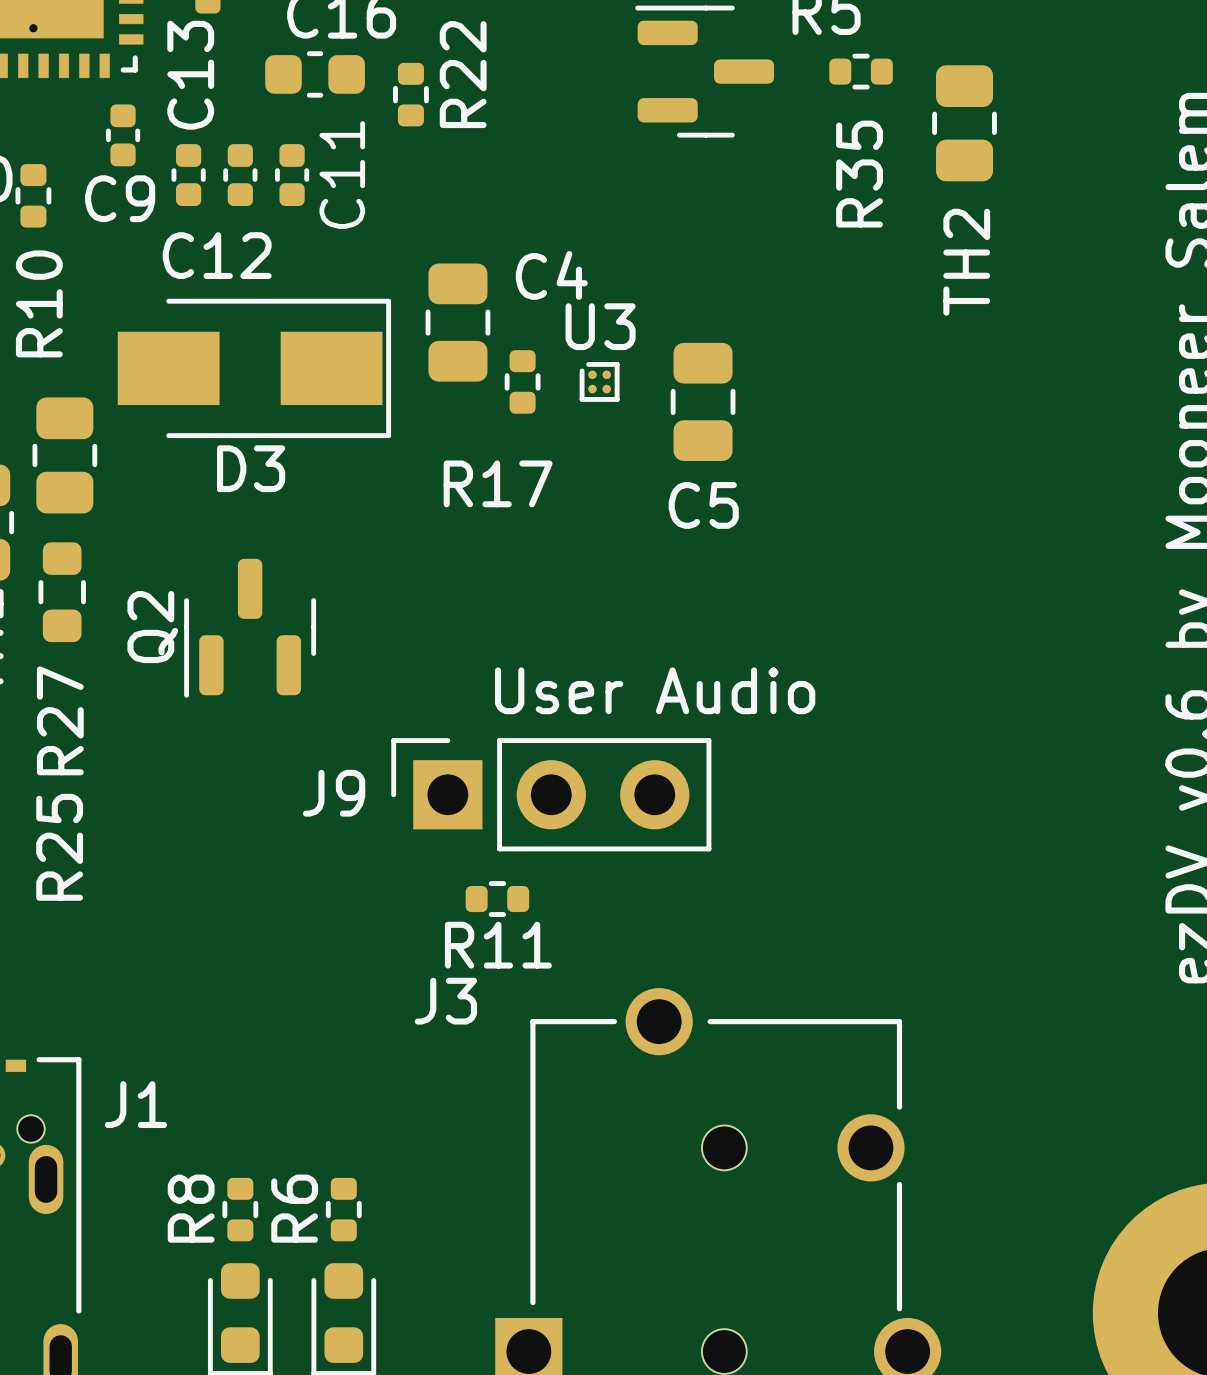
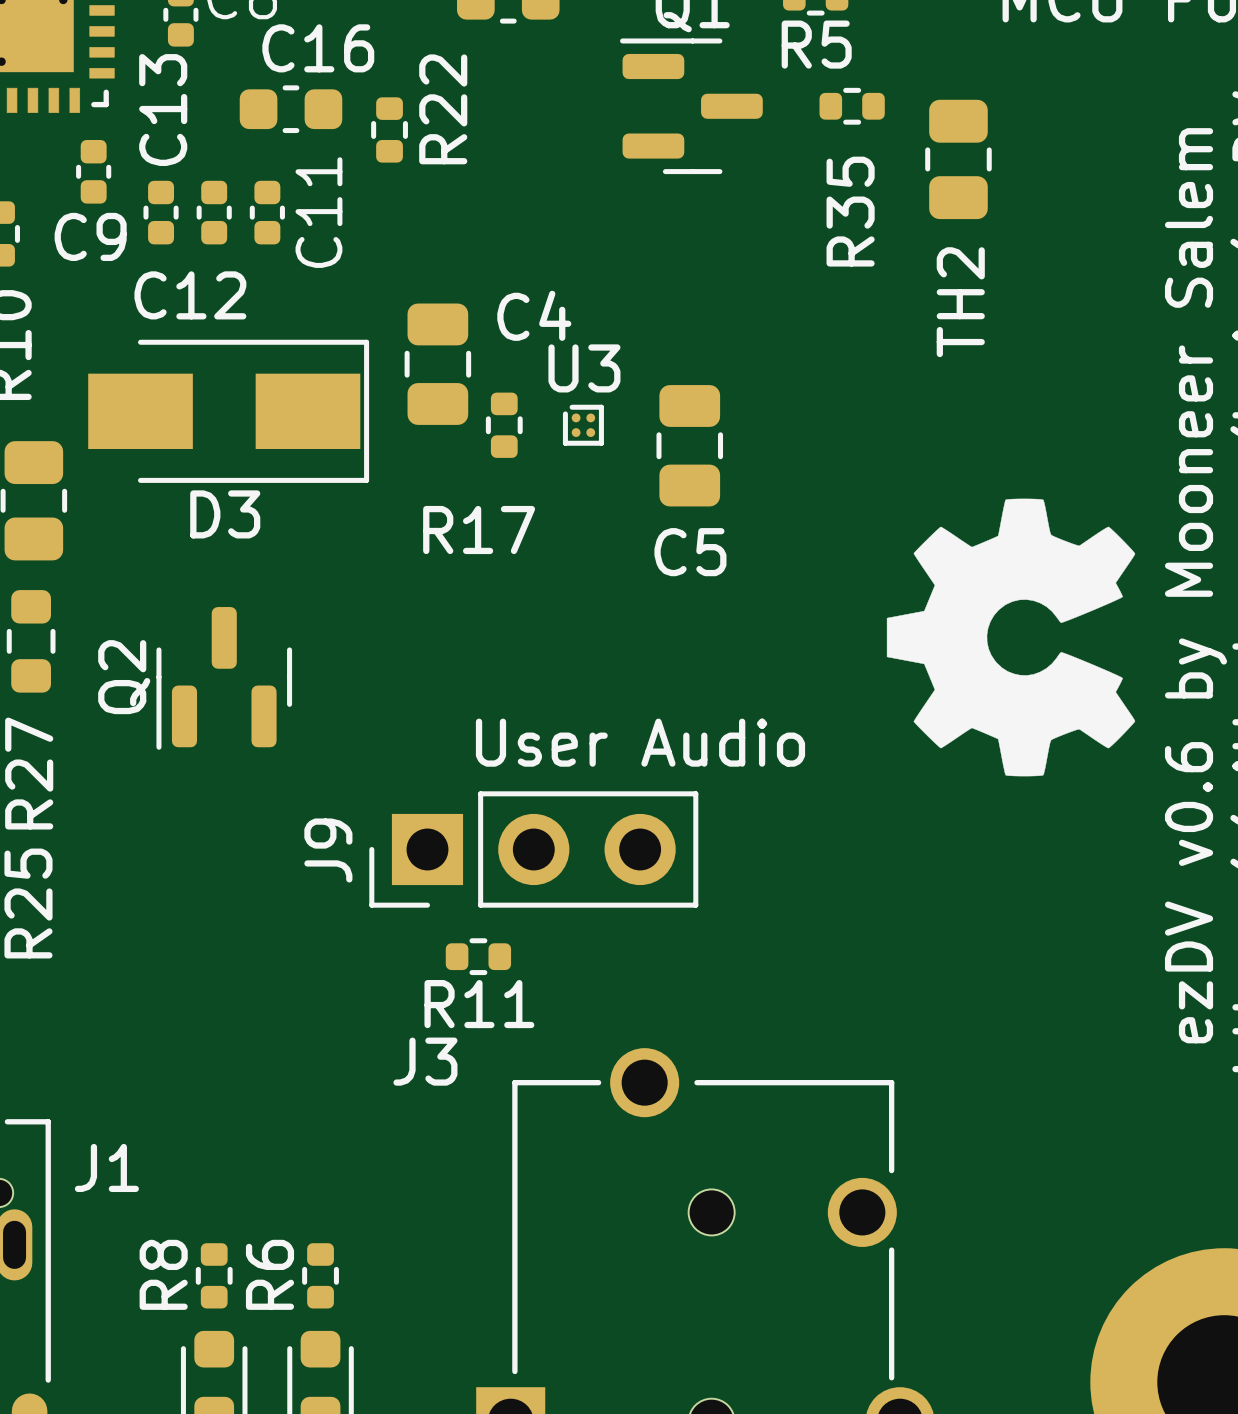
drawing: none -> [886, 498, 1136, 777]
J9 footprint: [391, 738, 712, 852] -> [369, 791, 699, 908]

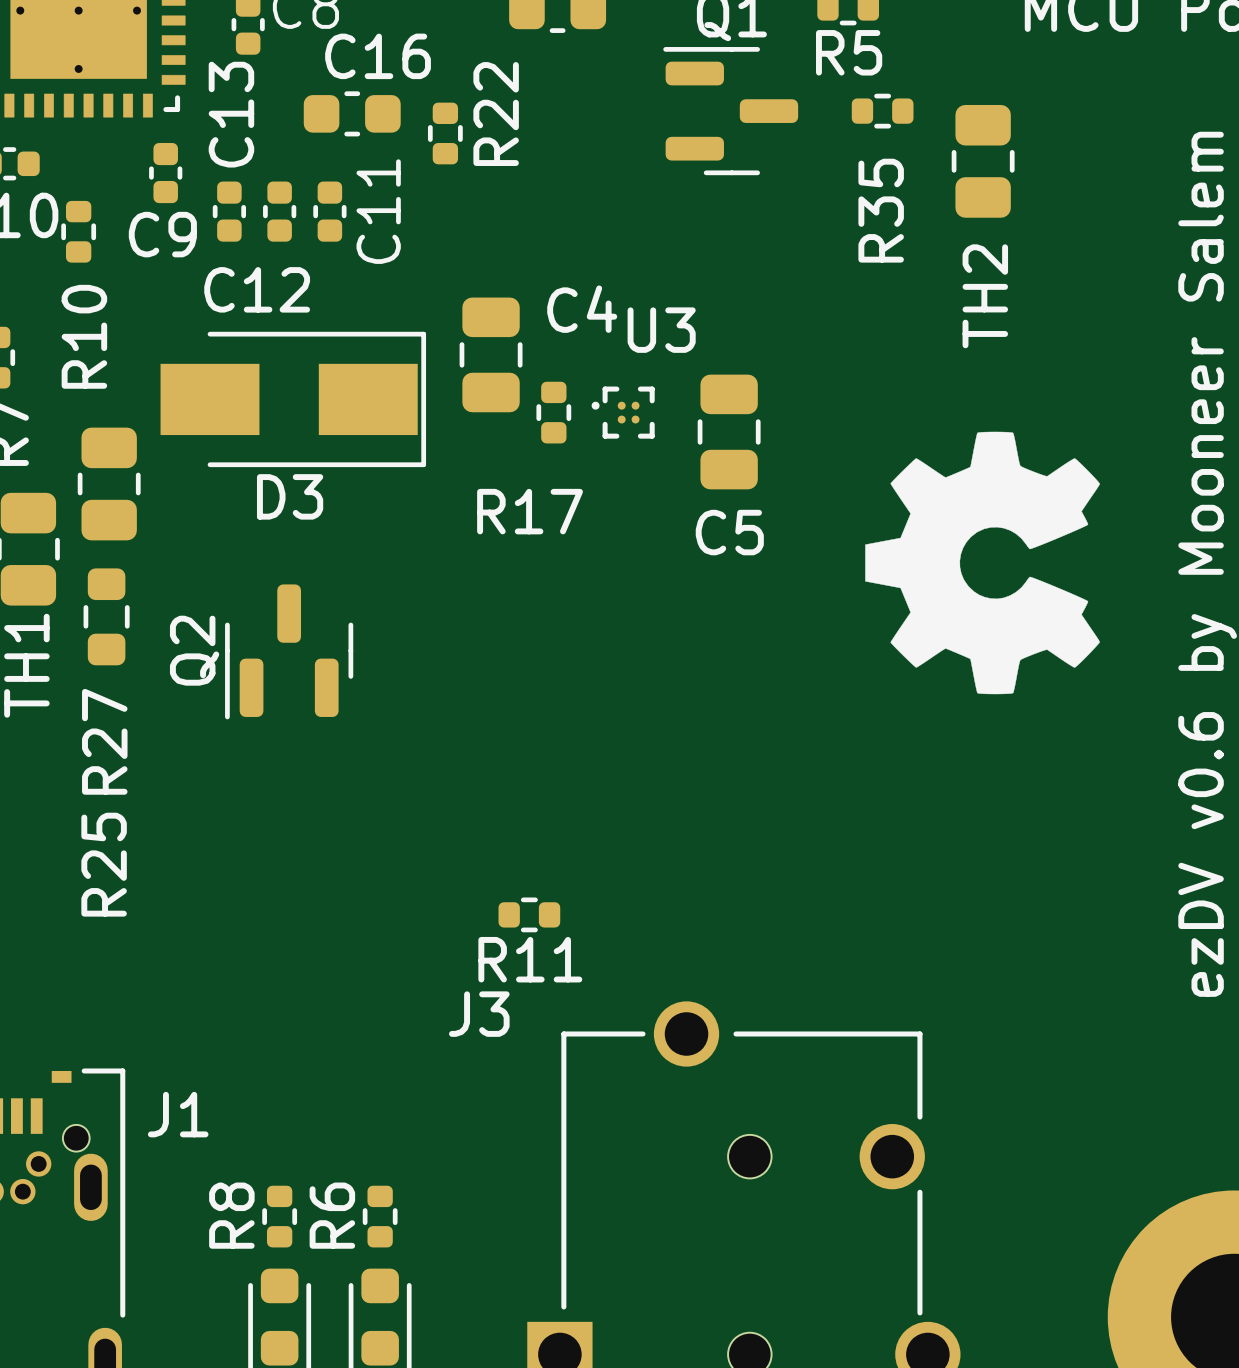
U3 name position: U3 (584, 368) -> U3 (661, 330)
U3 footprint: [562, 404, 604, 446] -> [591, 386, 655, 439]
drawing position: (1011, 637) -> (982, 562)
text: User Audio (640, 742) -> none
J9: (533, 849) -> none

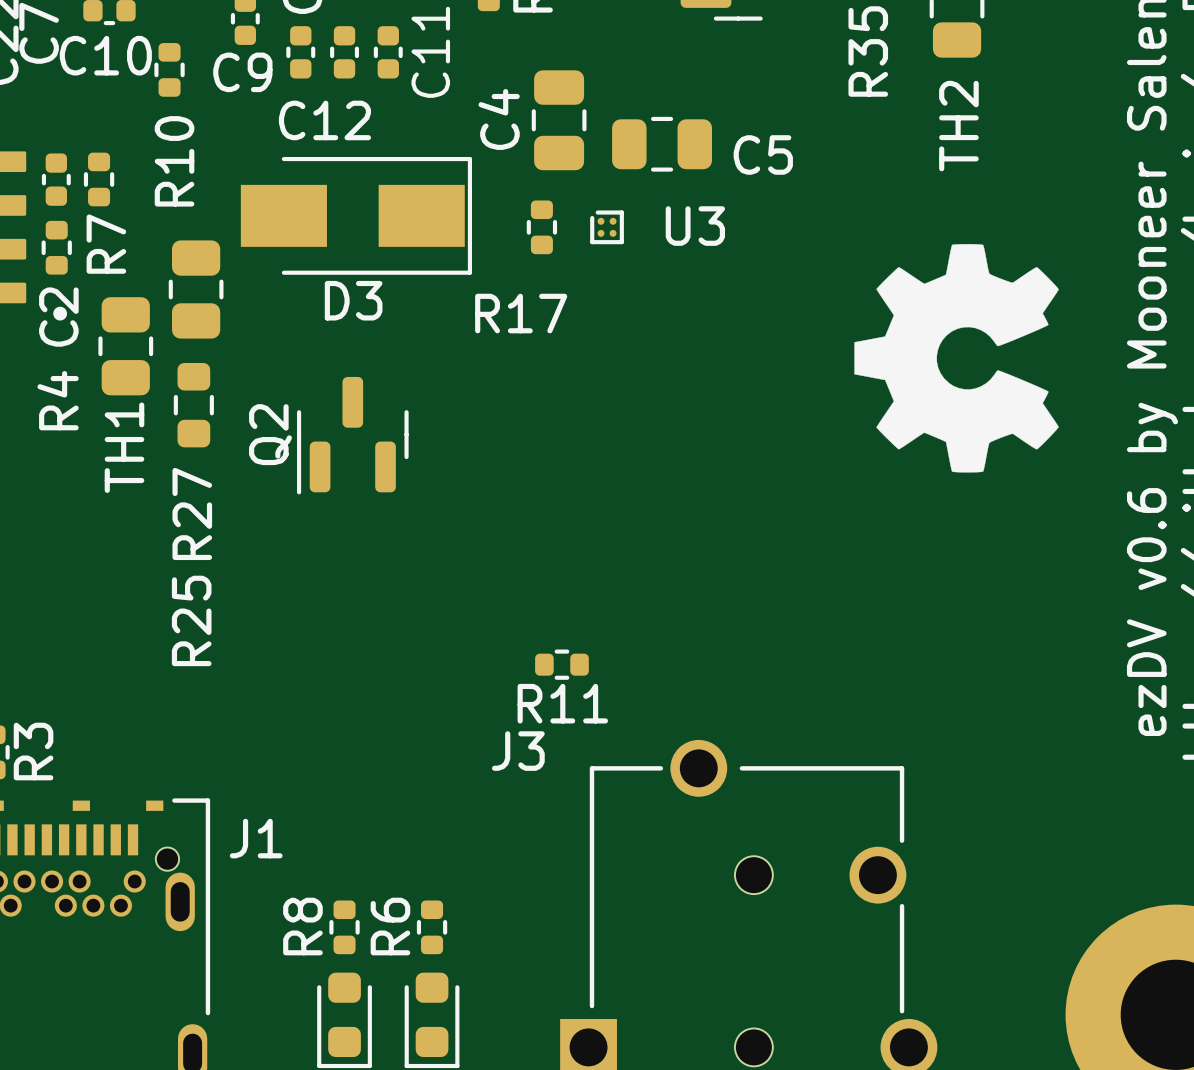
C4 name rotation: 0° (582, 309) -> 90° counterclockwise (499, 119)
C4 name position: C4 (582, 309) -> C4 (499, 119)
U3 name position: U3 (661, 330) -> U3 (695, 226)
C4 position: (491, 354) -> (559, 120)
U3 footprint: [591, 386, 655, 439] -> [590, 210, 624, 245]
R17 position: (553, 412) -> (541, 227)
C5 rotation: 0° (729, 431) -> 90° clockwise (662, 144)
C5 position: (729, 431) -> (662, 144)
C5 name position: C5 (729, 532) -> C5 (763, 154)

